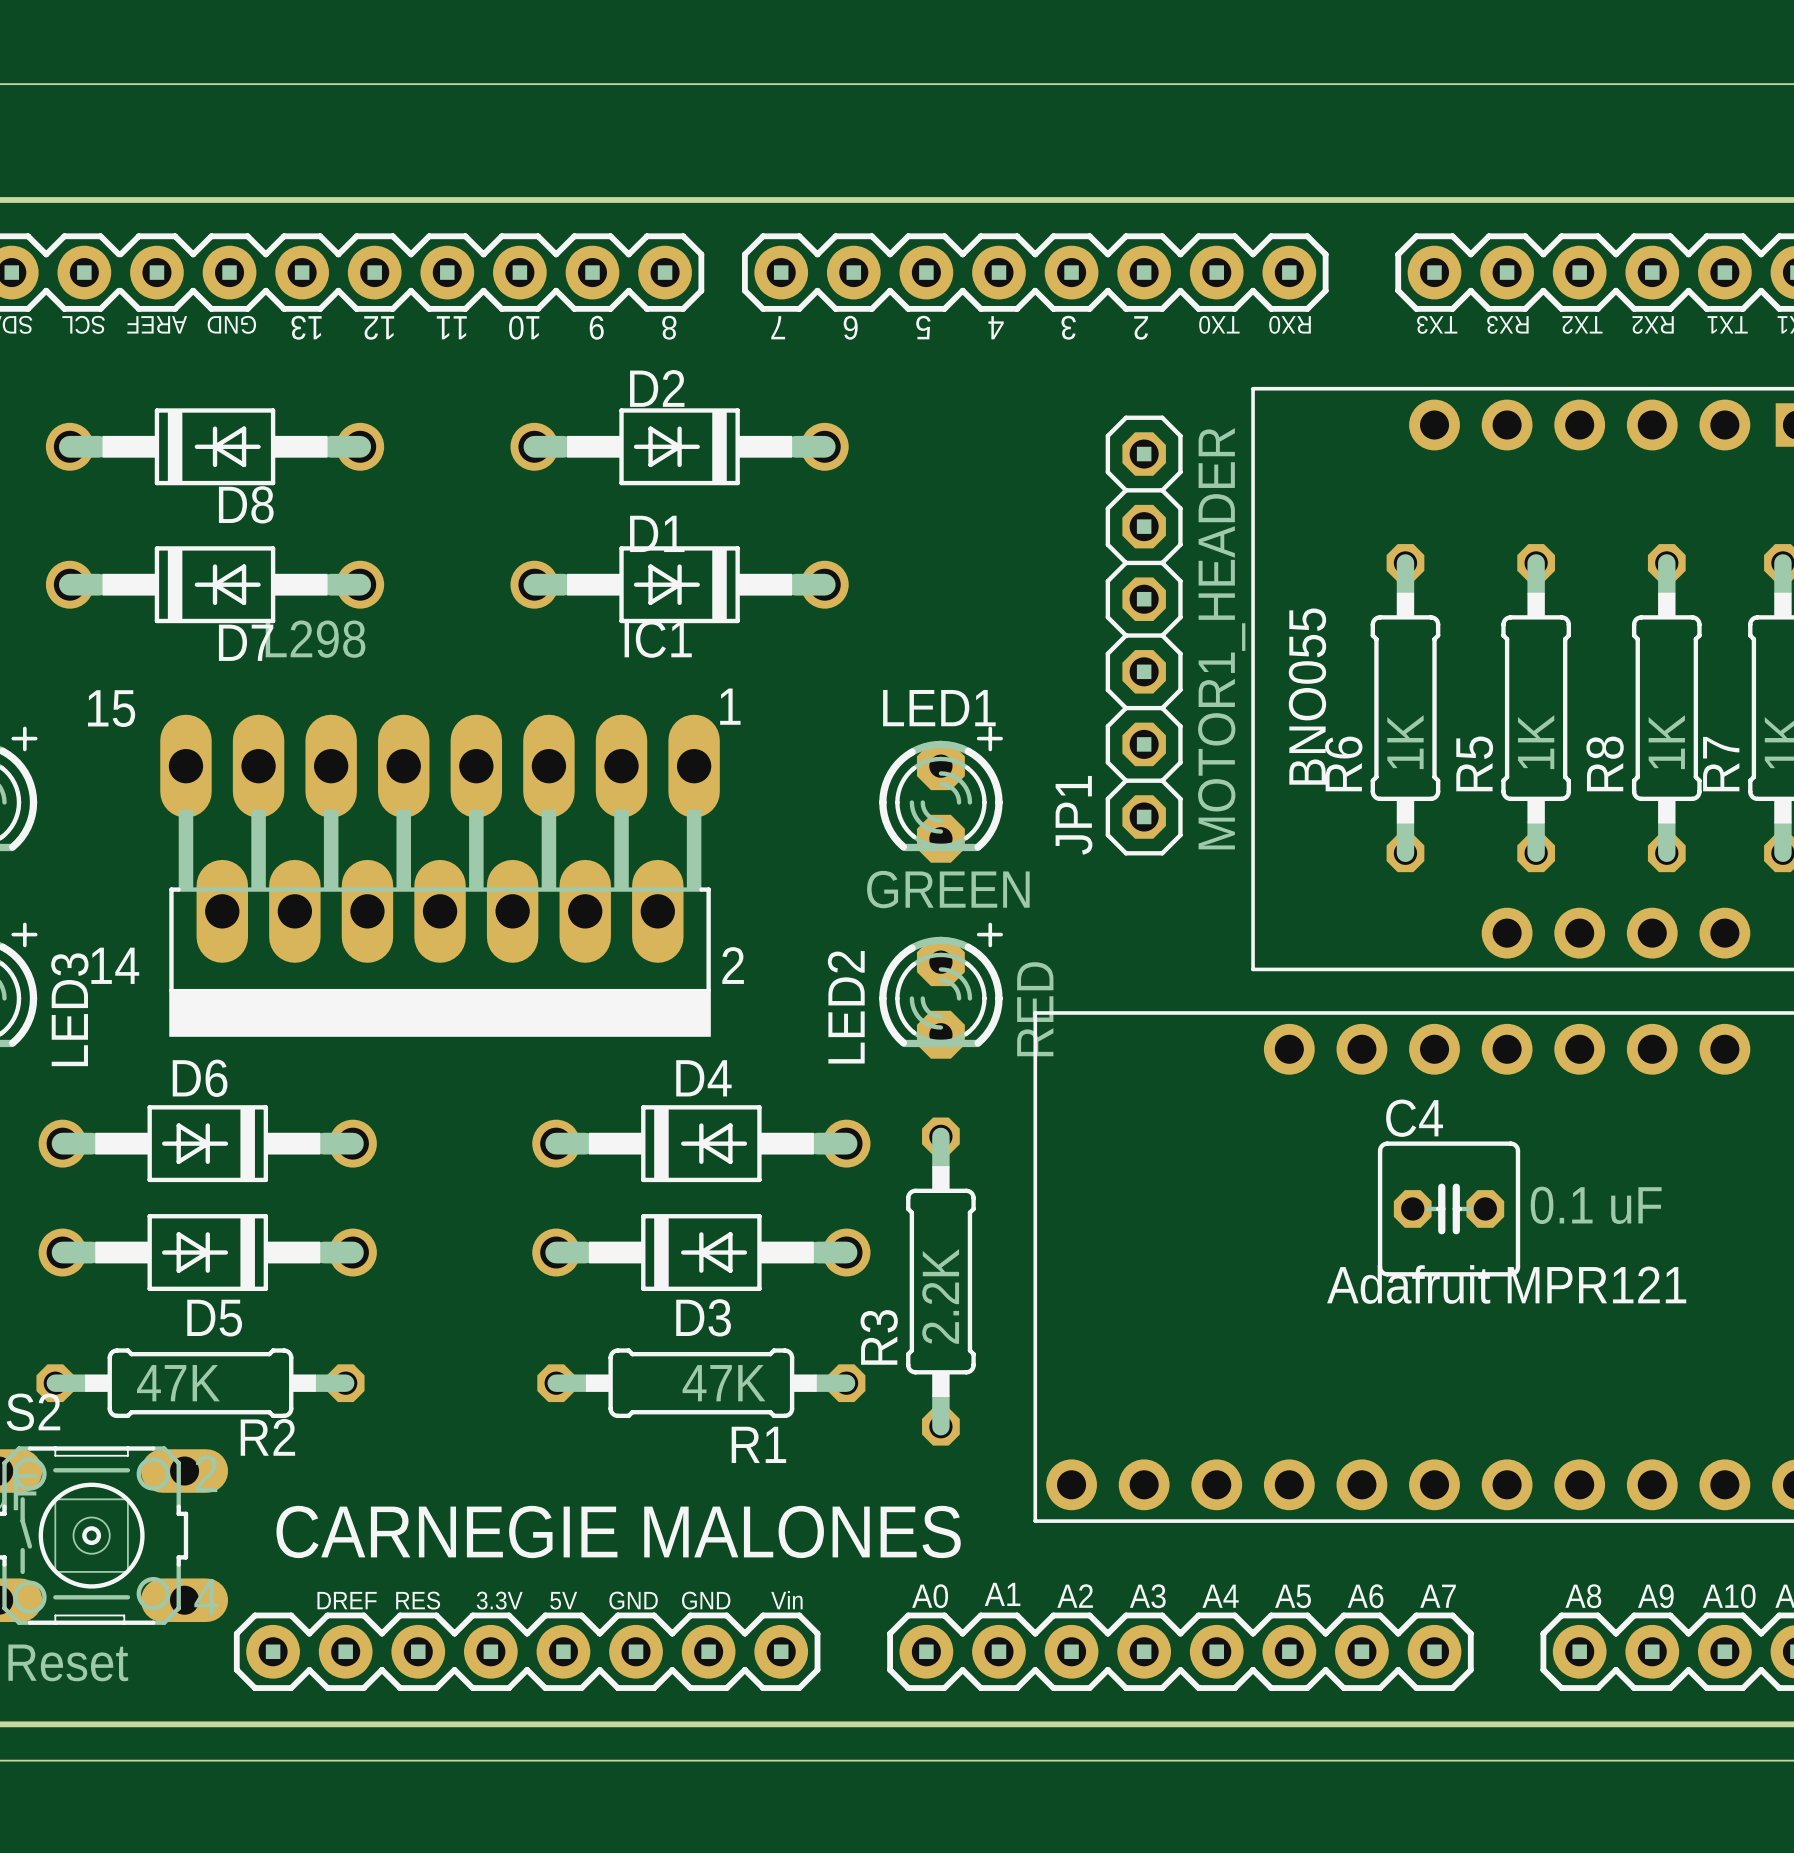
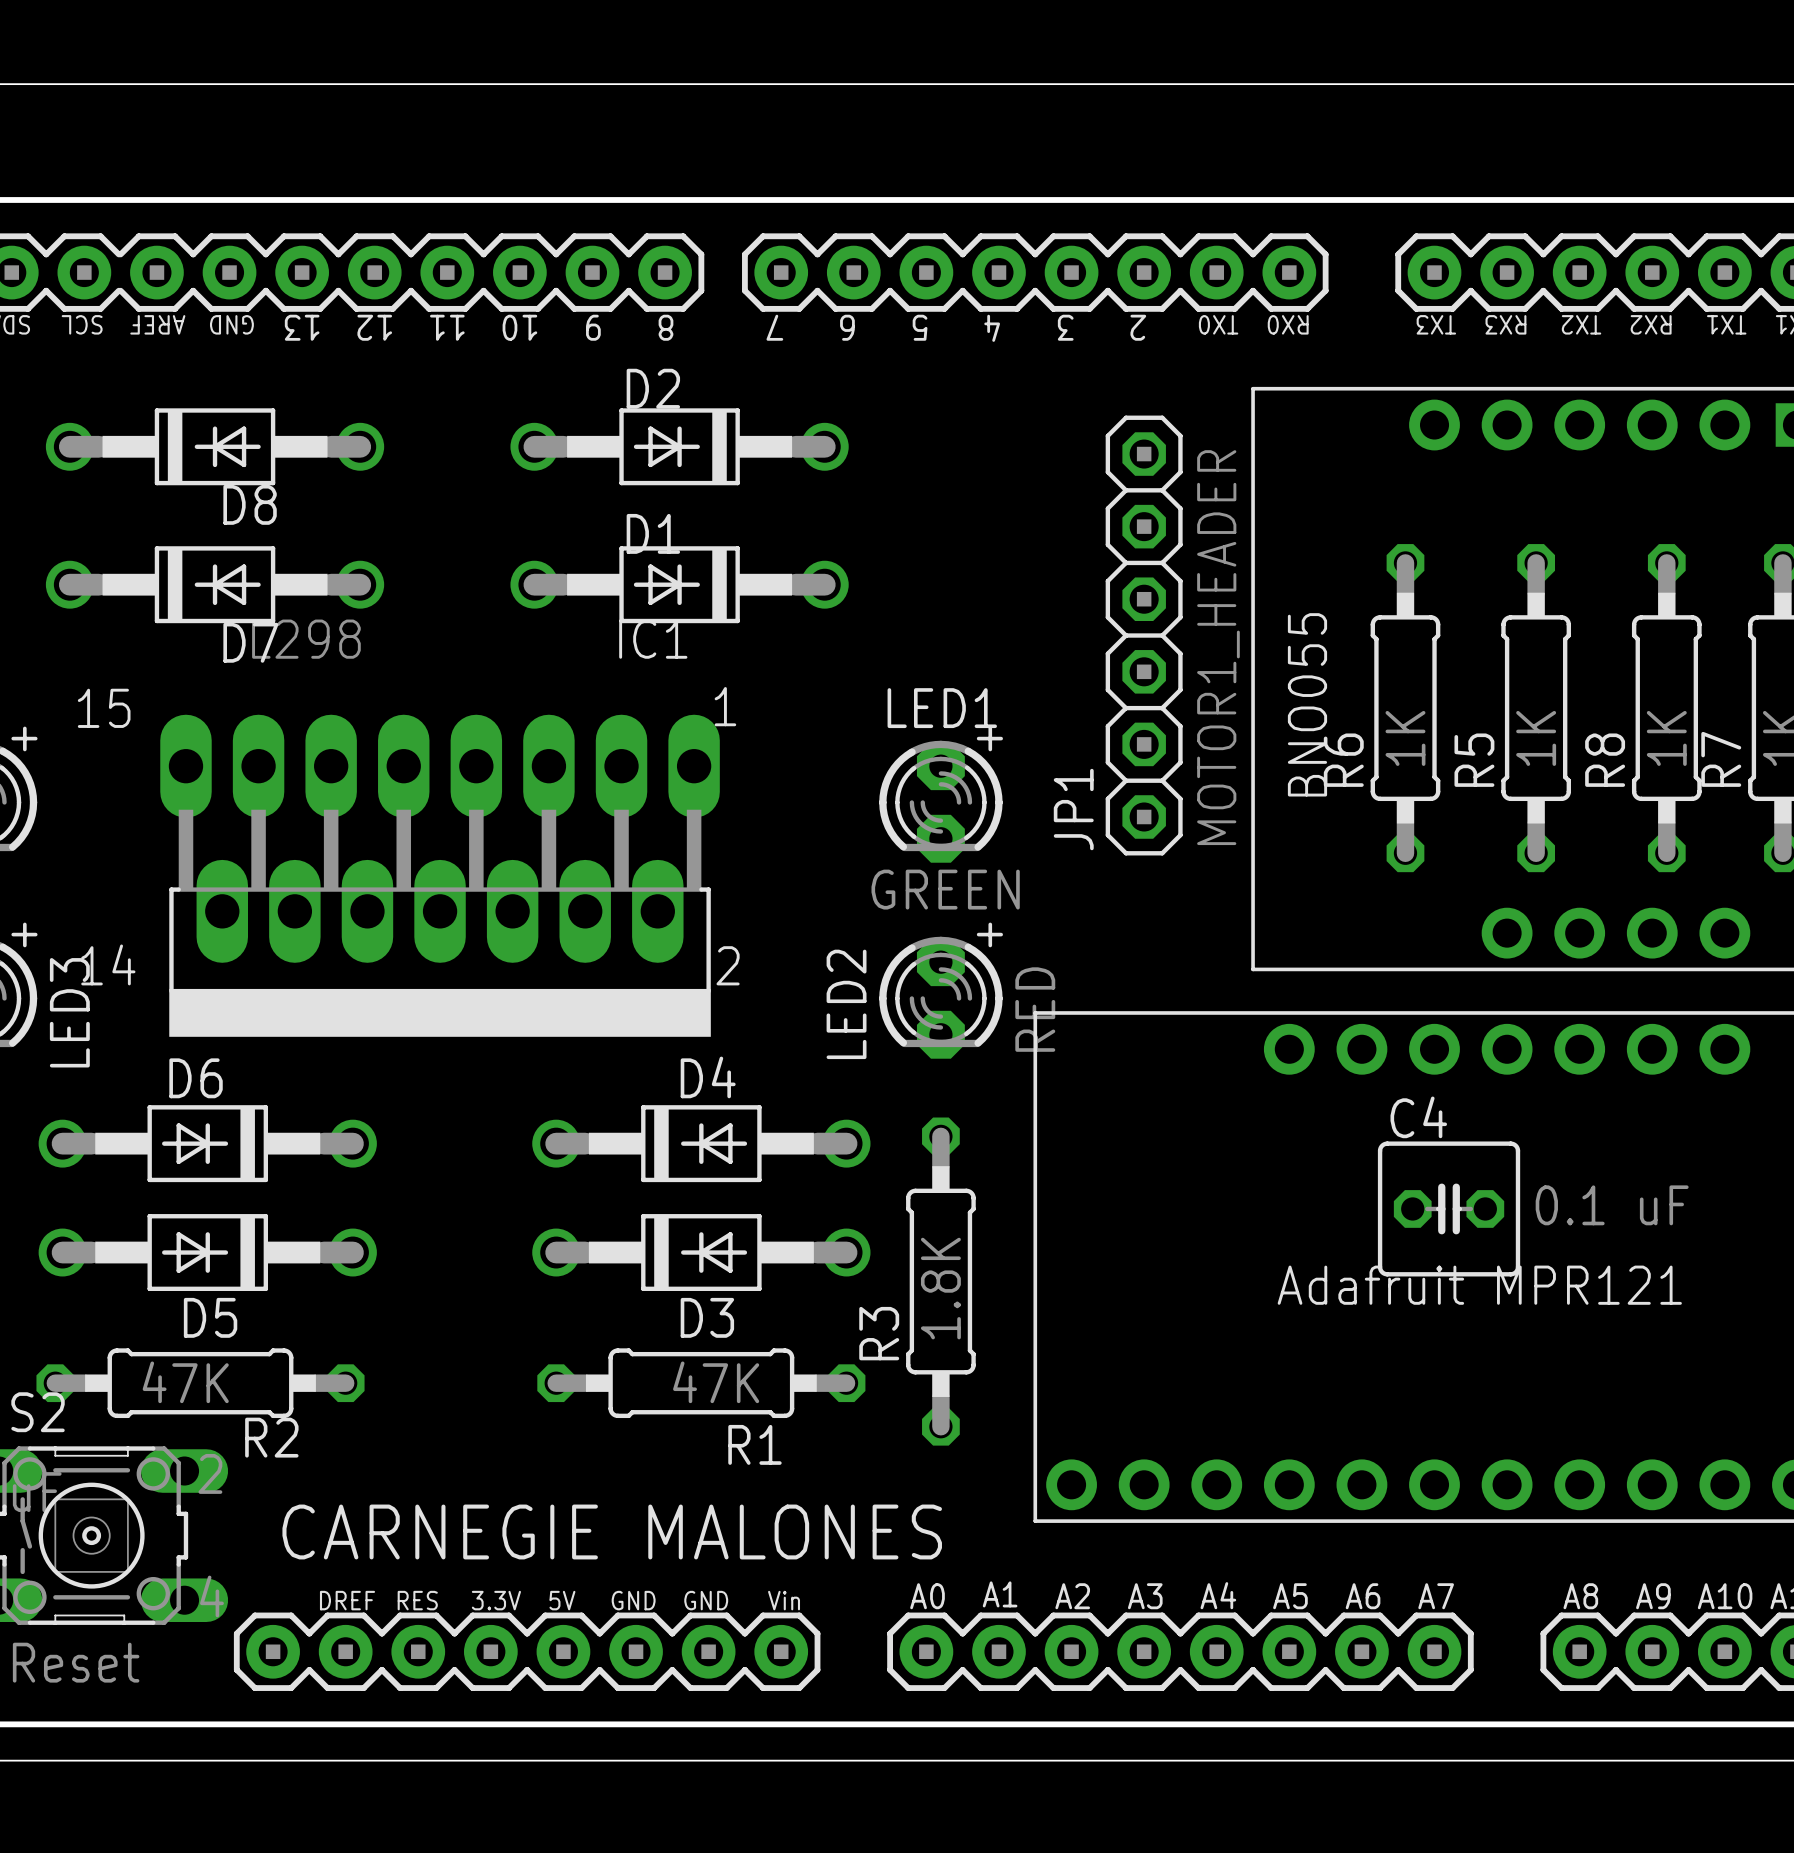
R3 value: 2.2K (940, 1296) -> 1.8K (940, 1288)

